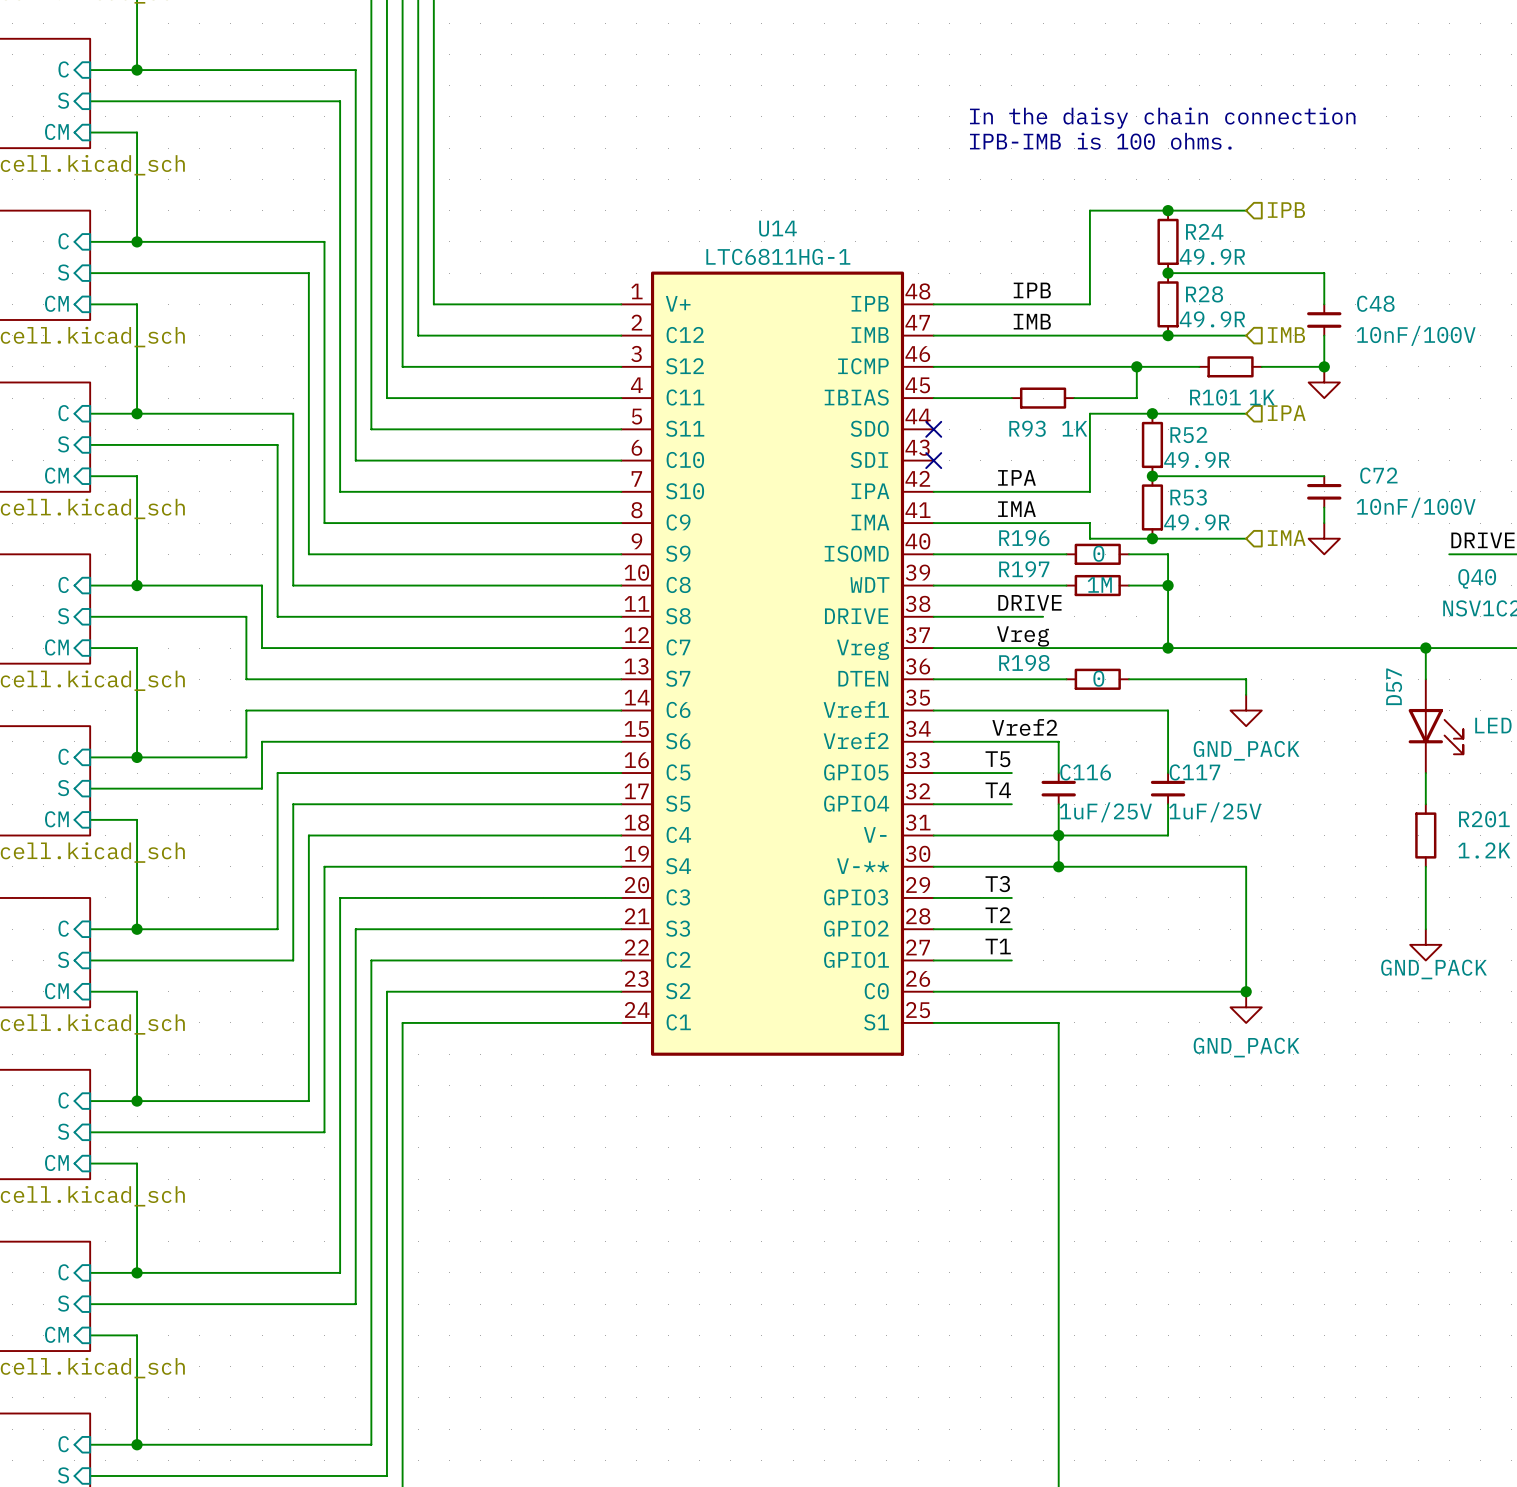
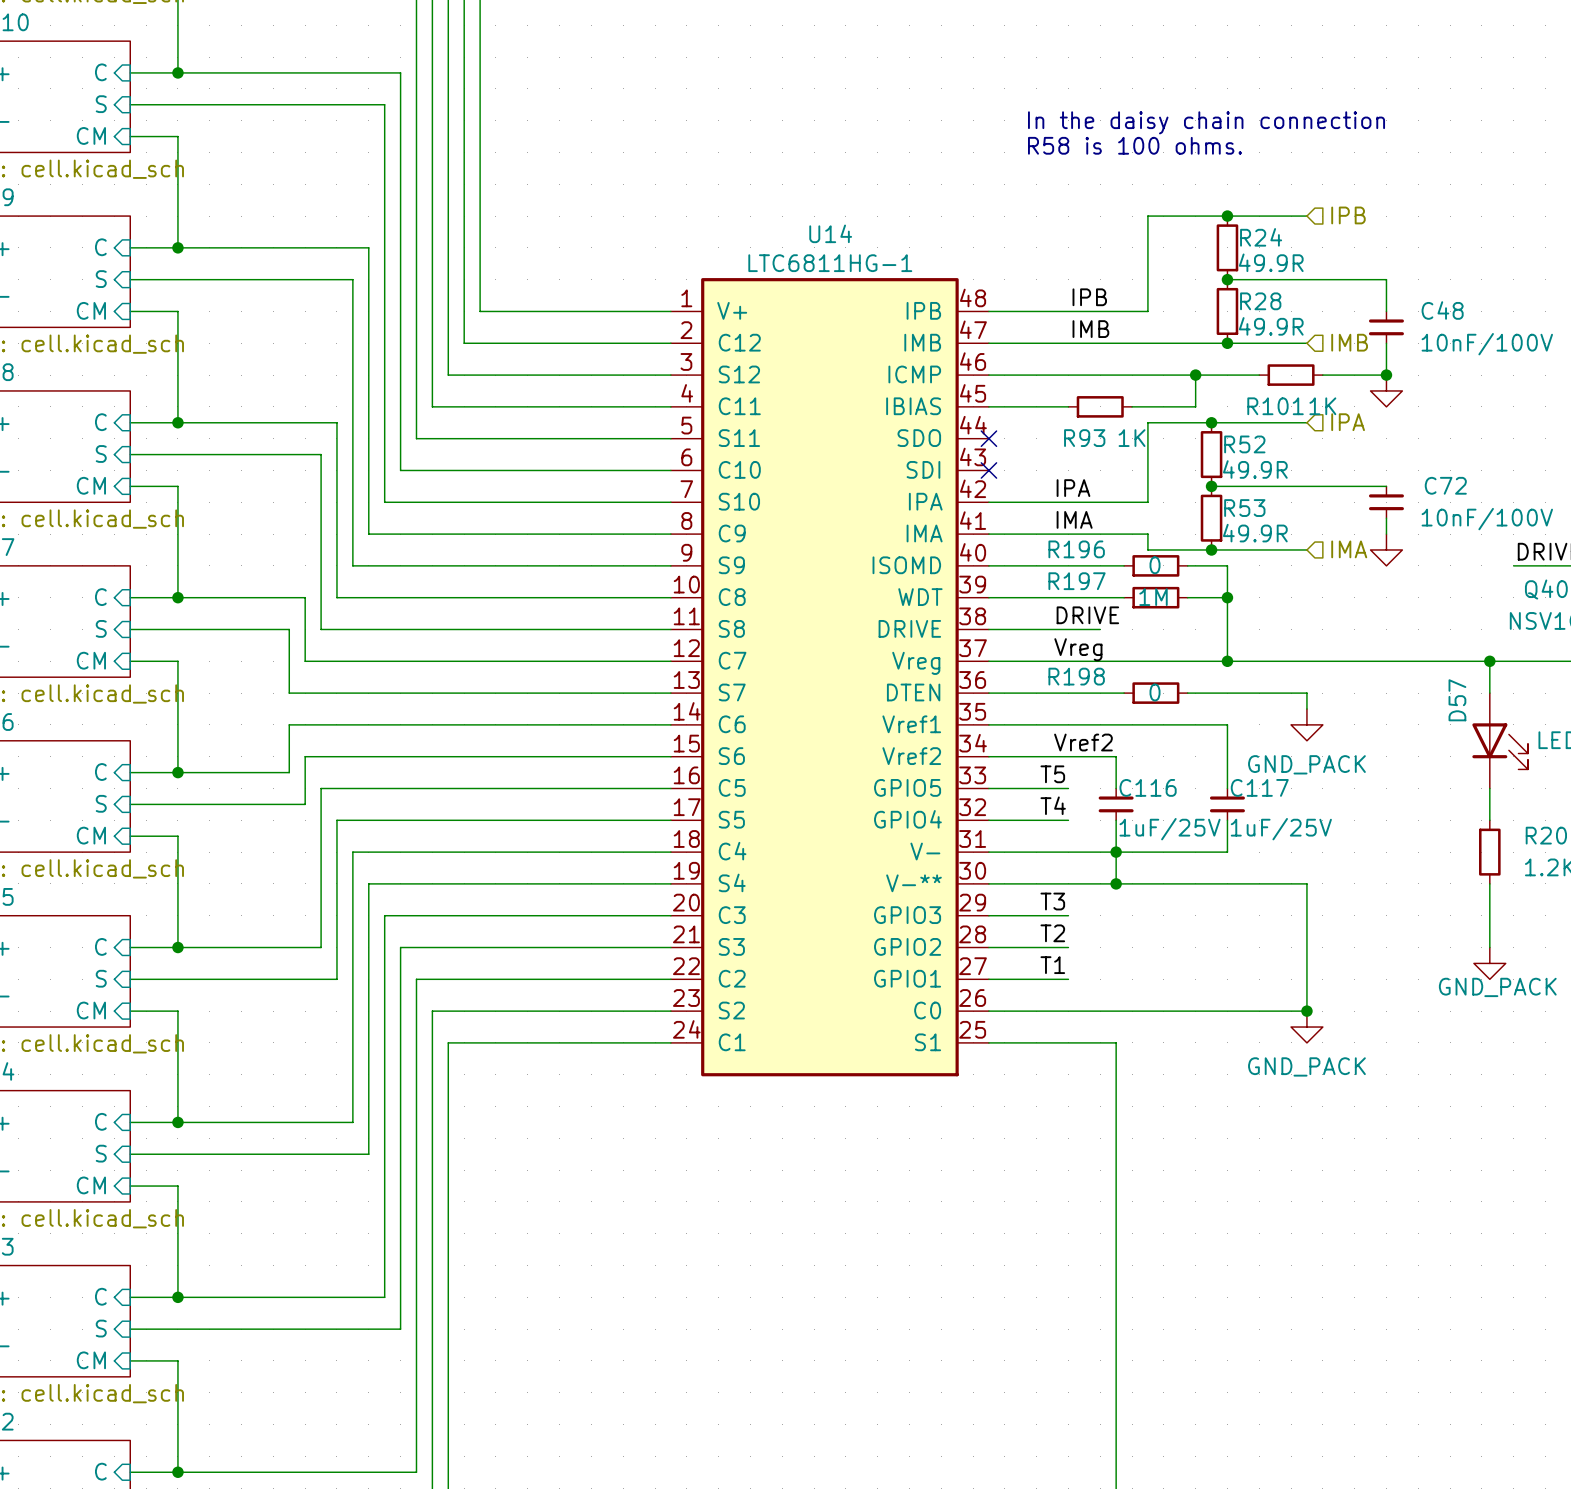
text: IPB-IMB is 100 ohms. (1100, 141) -> R58 is 100 ohms. (1134, 145)

